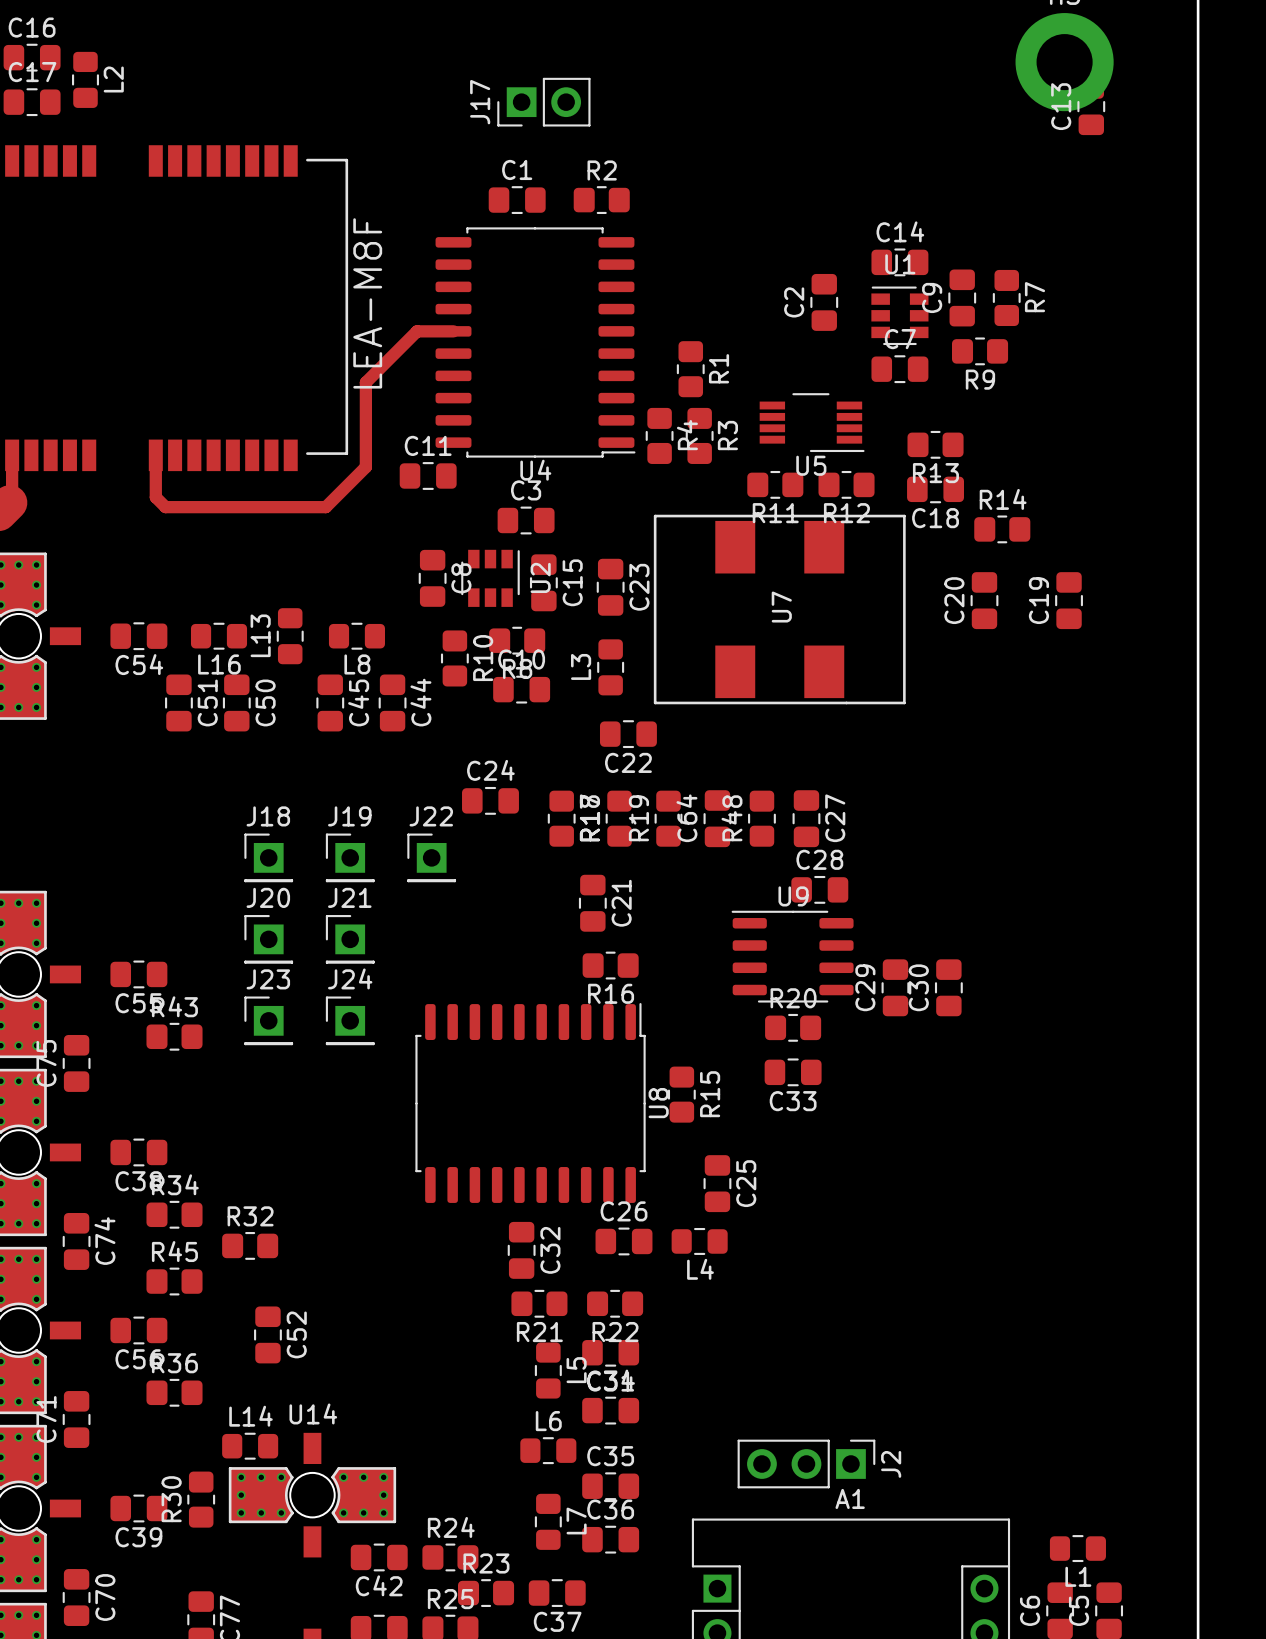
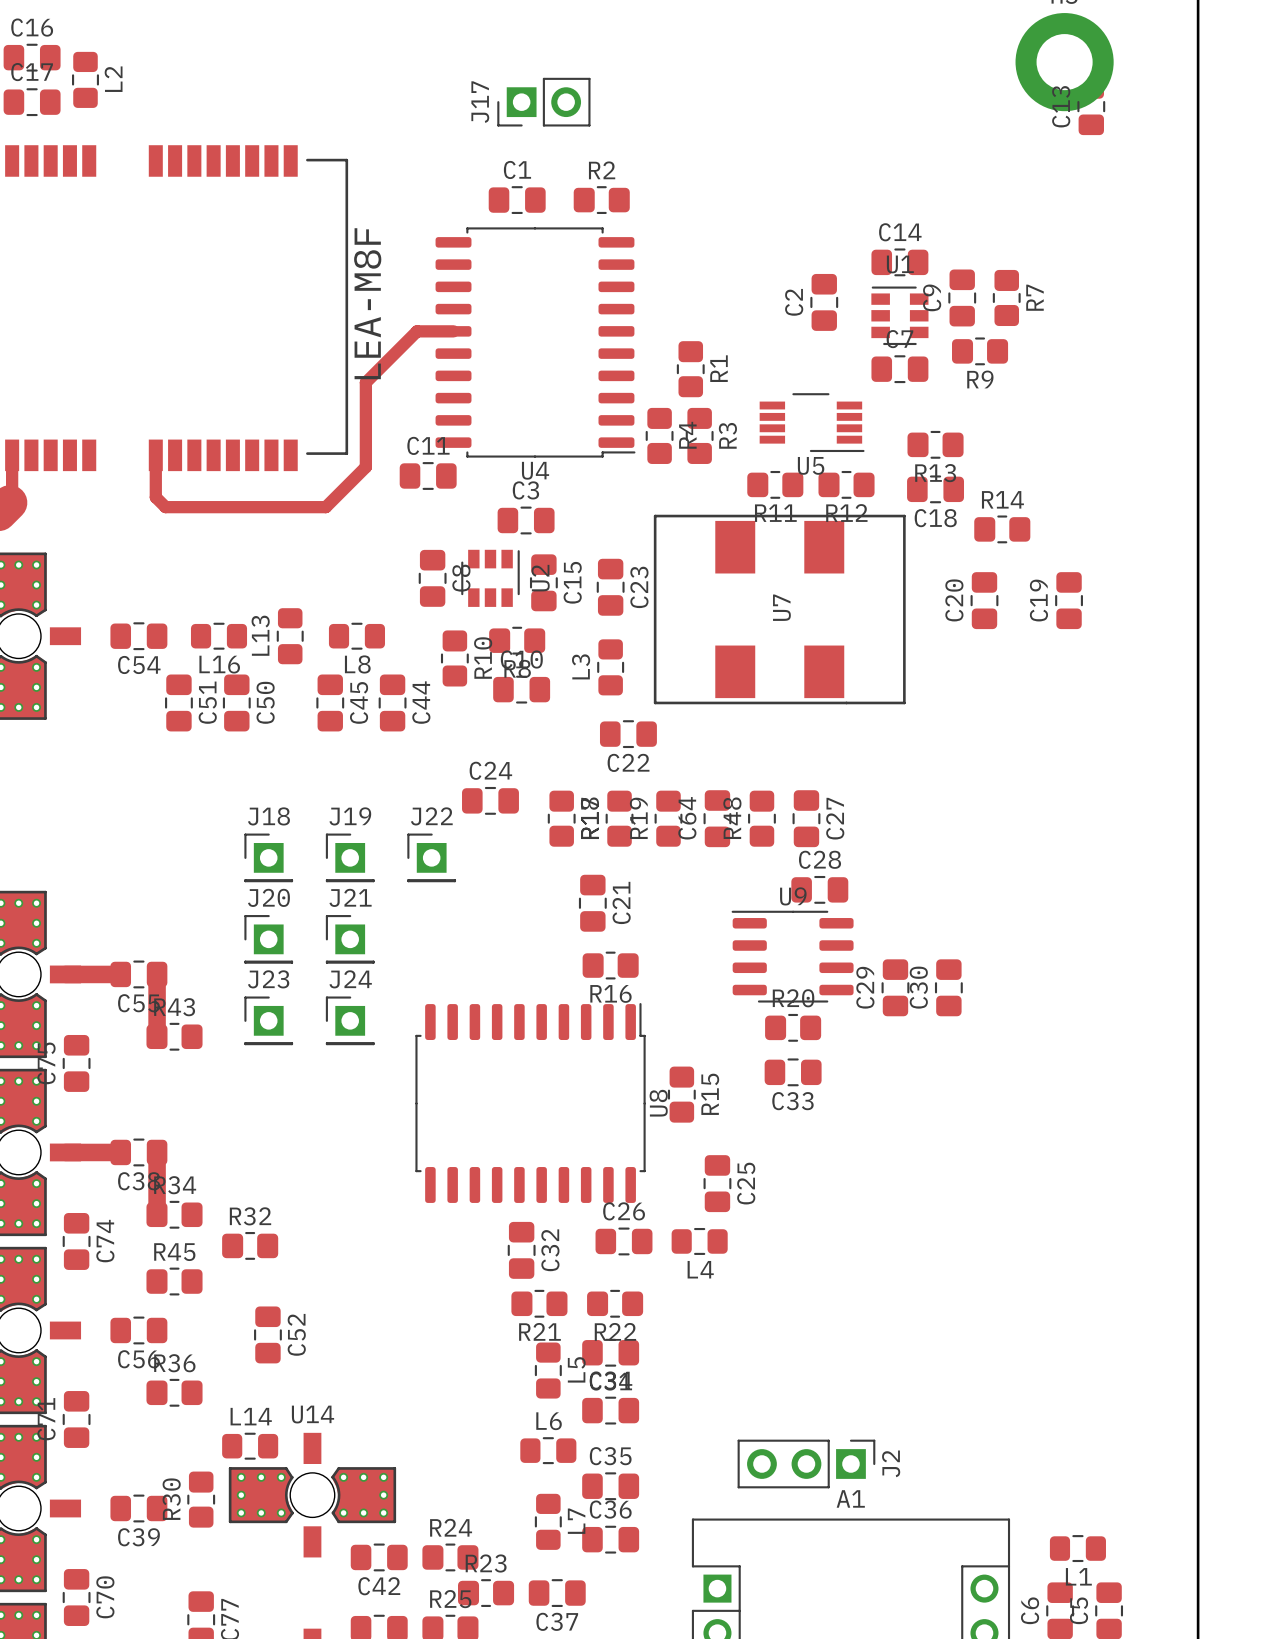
track: none -> (65, 974) (120, 974)
track: none -> (157, 974) (157, 1036)
track: none -> (65, 1152) (120, 1152)
track: none -> (157, 1152) (157, 1214)

